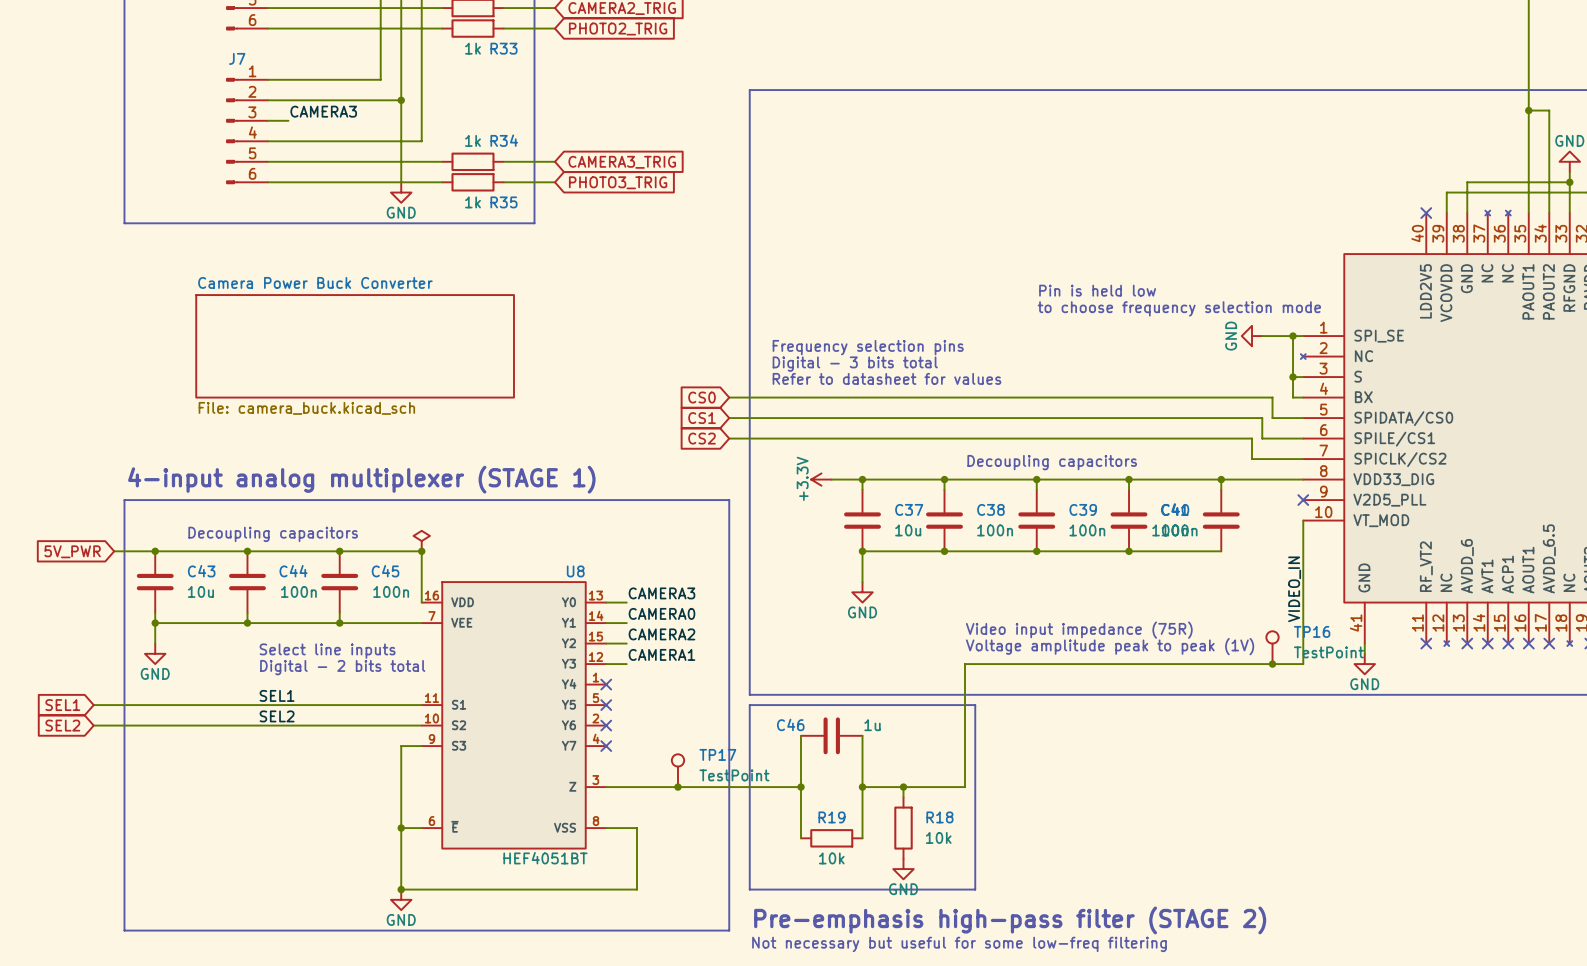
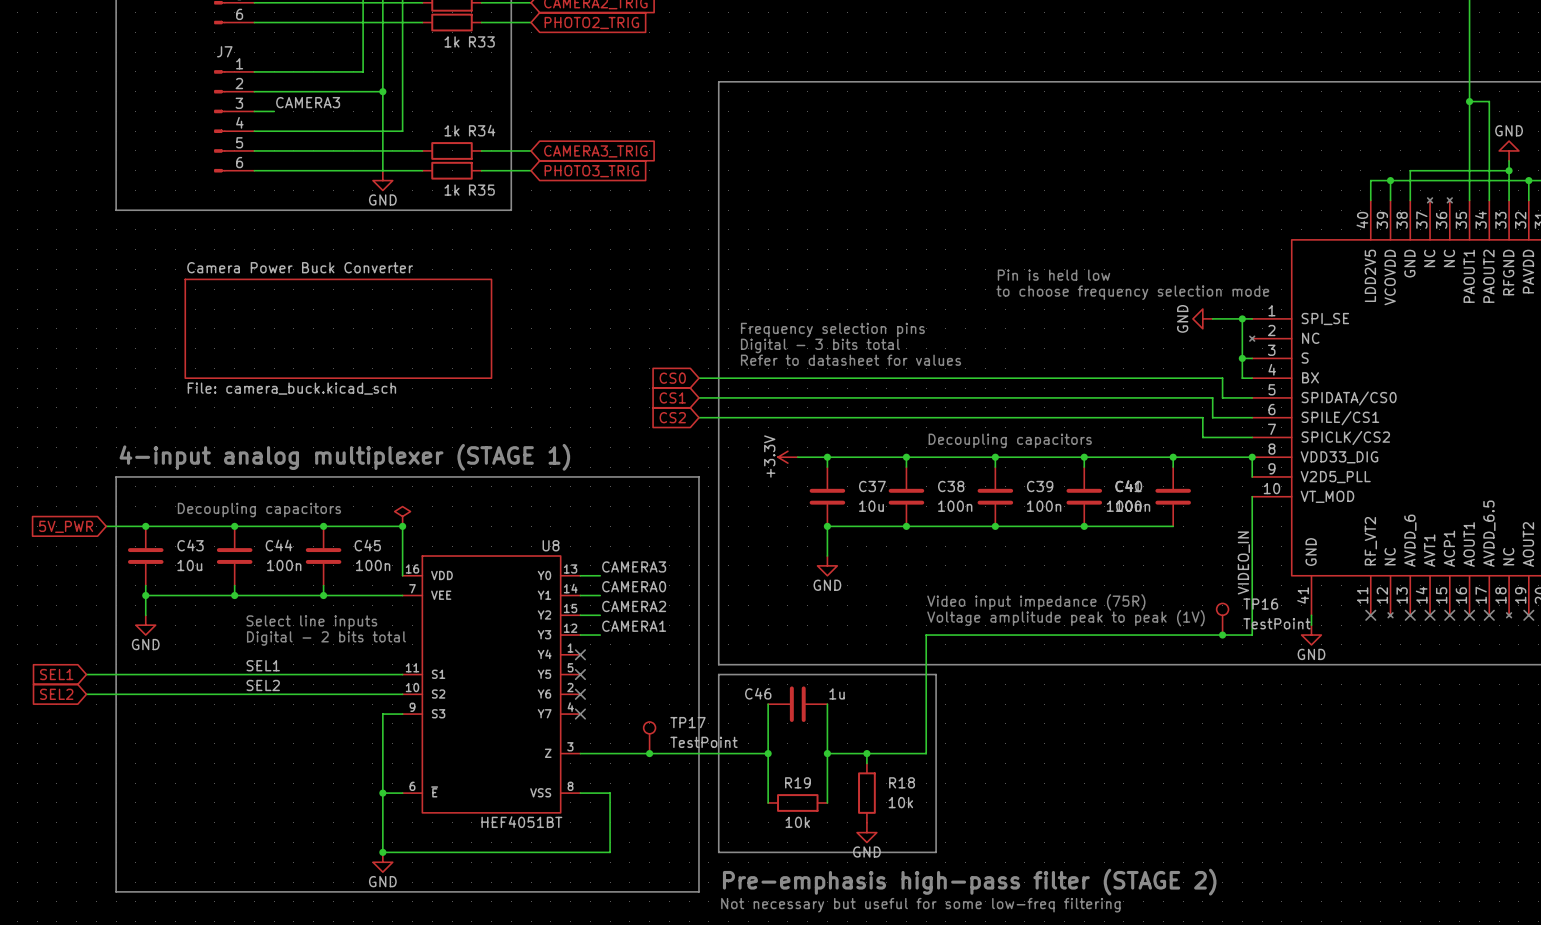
wire: none -> (1390, 180) (1370, 180) (1370, 200)
junction: none -> (1390, 180)
no-connect mark: (1426, 213) -> none
wire: none -> (1252, 457) (1252, 476)
junction: none -> (1252, 457)
no-connect mark: (1303, 500) -> none

